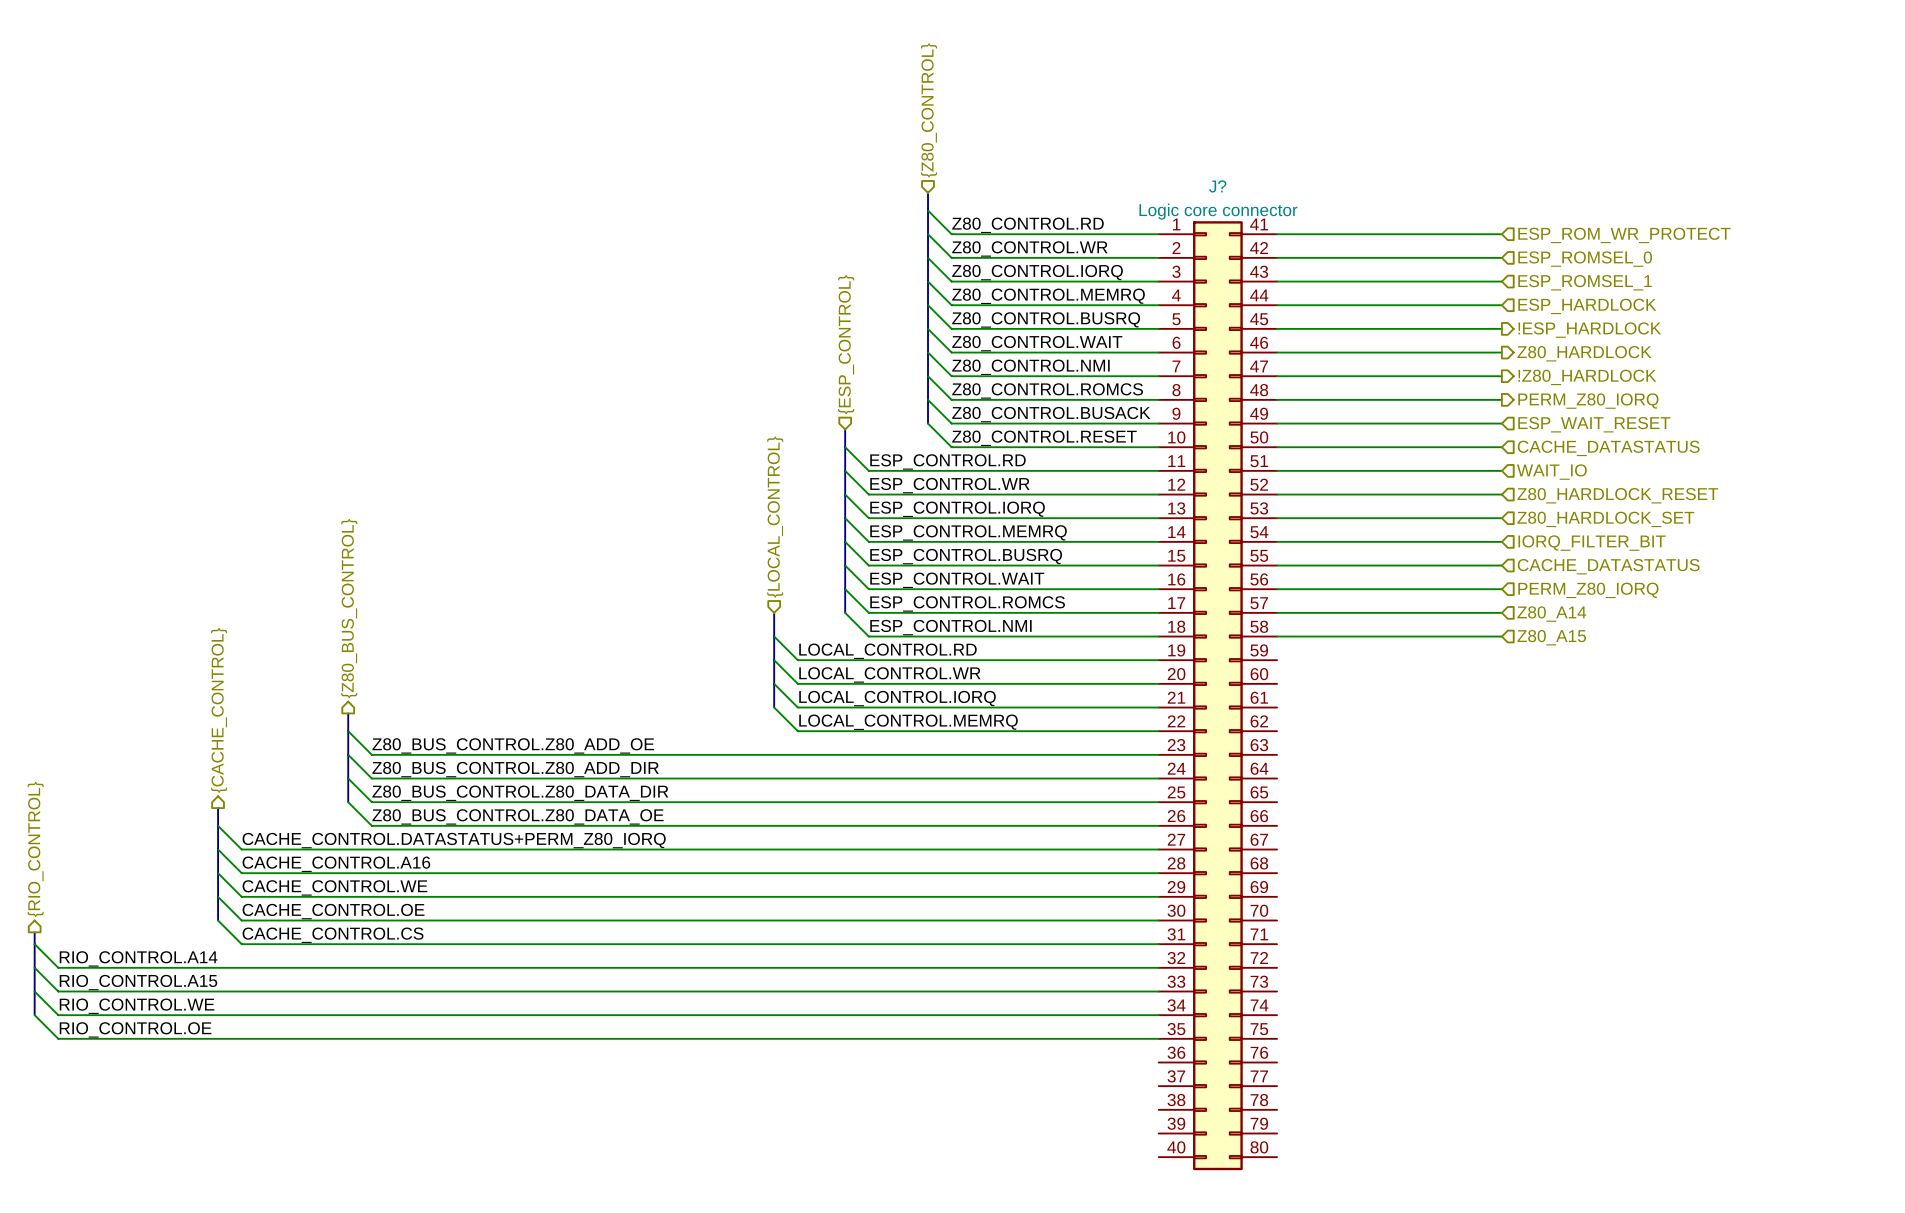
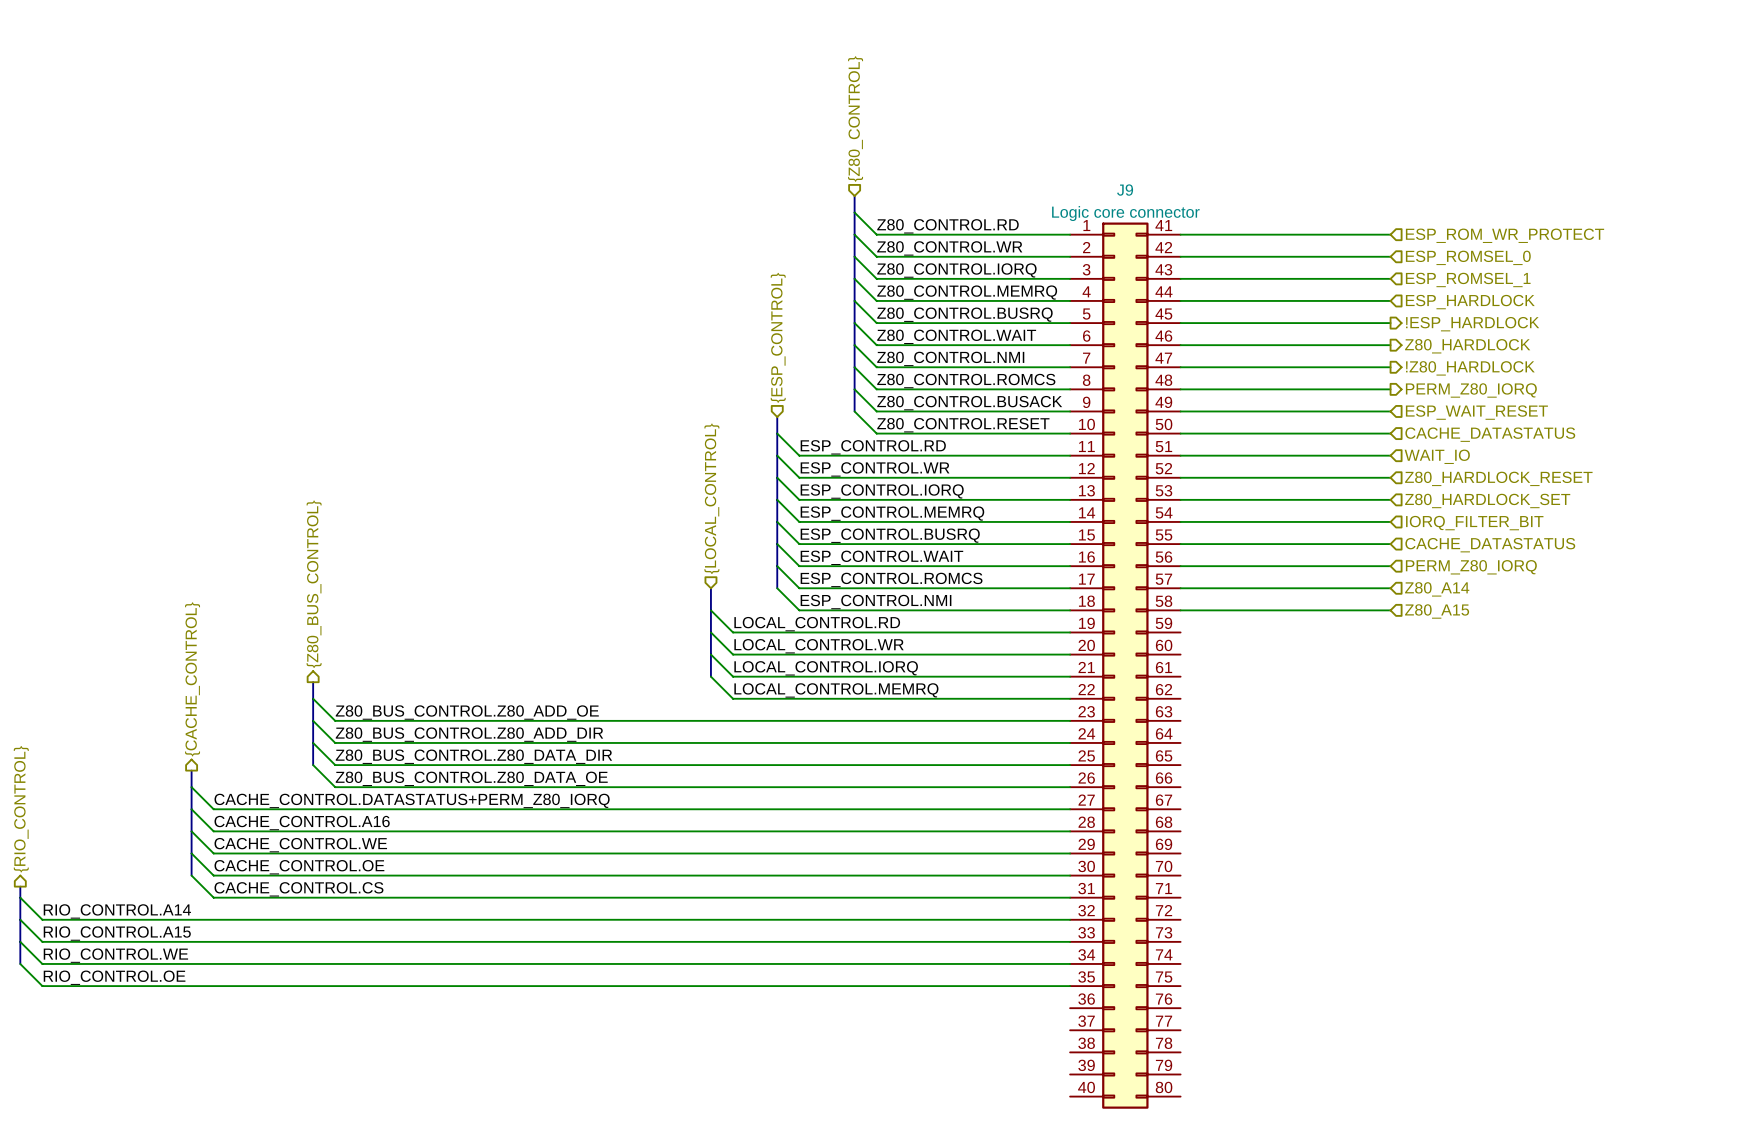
J? name: J? (1217, 186) -> J9 (1125, 190)

